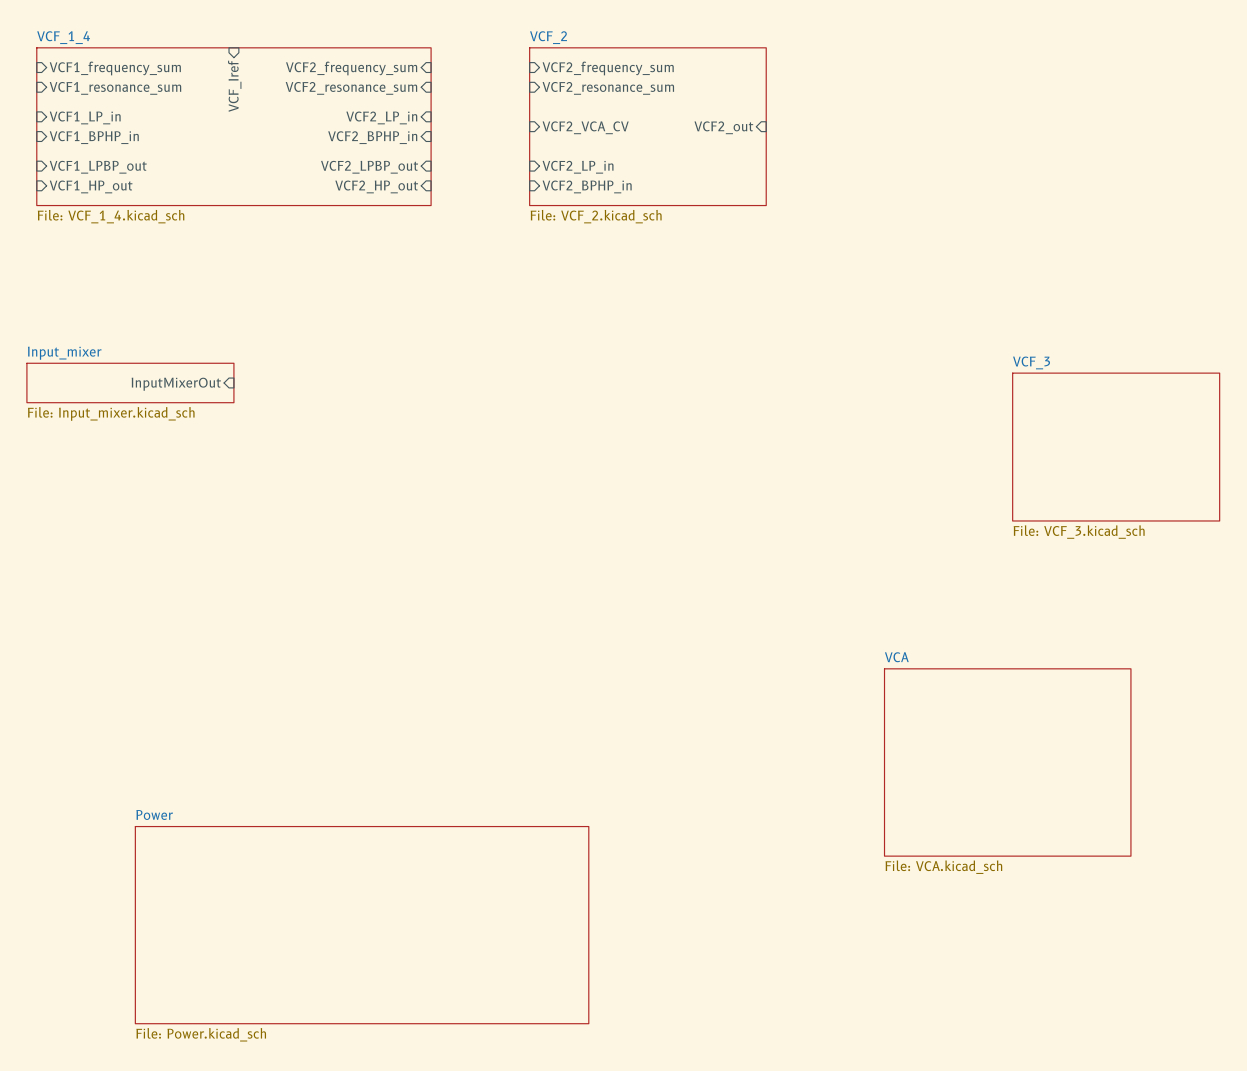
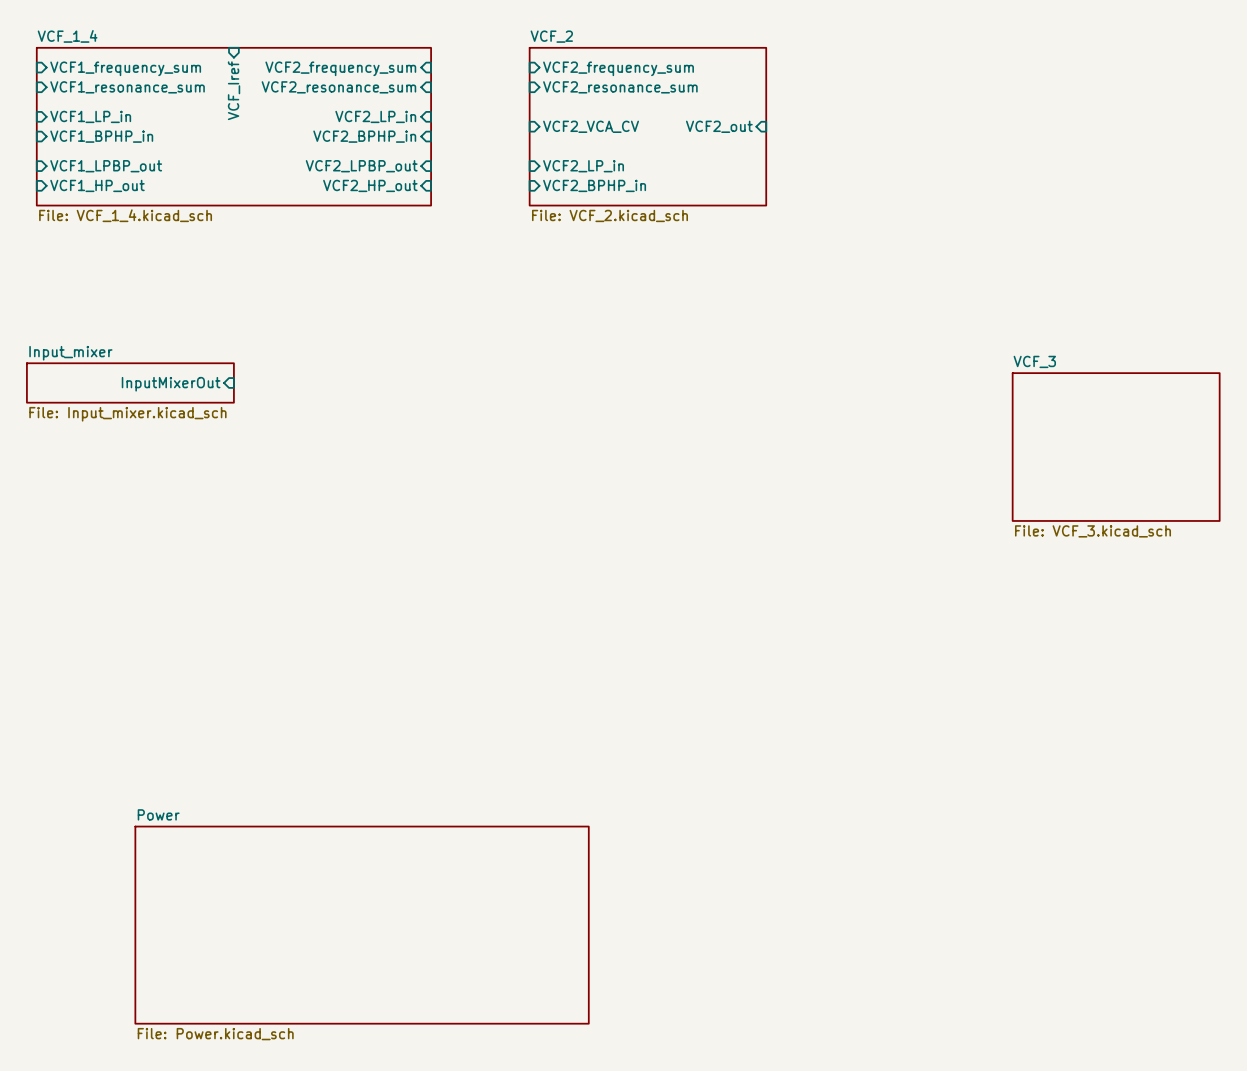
sheet VCA: File: VCA.kicad_sch (1007, 762) -> none

